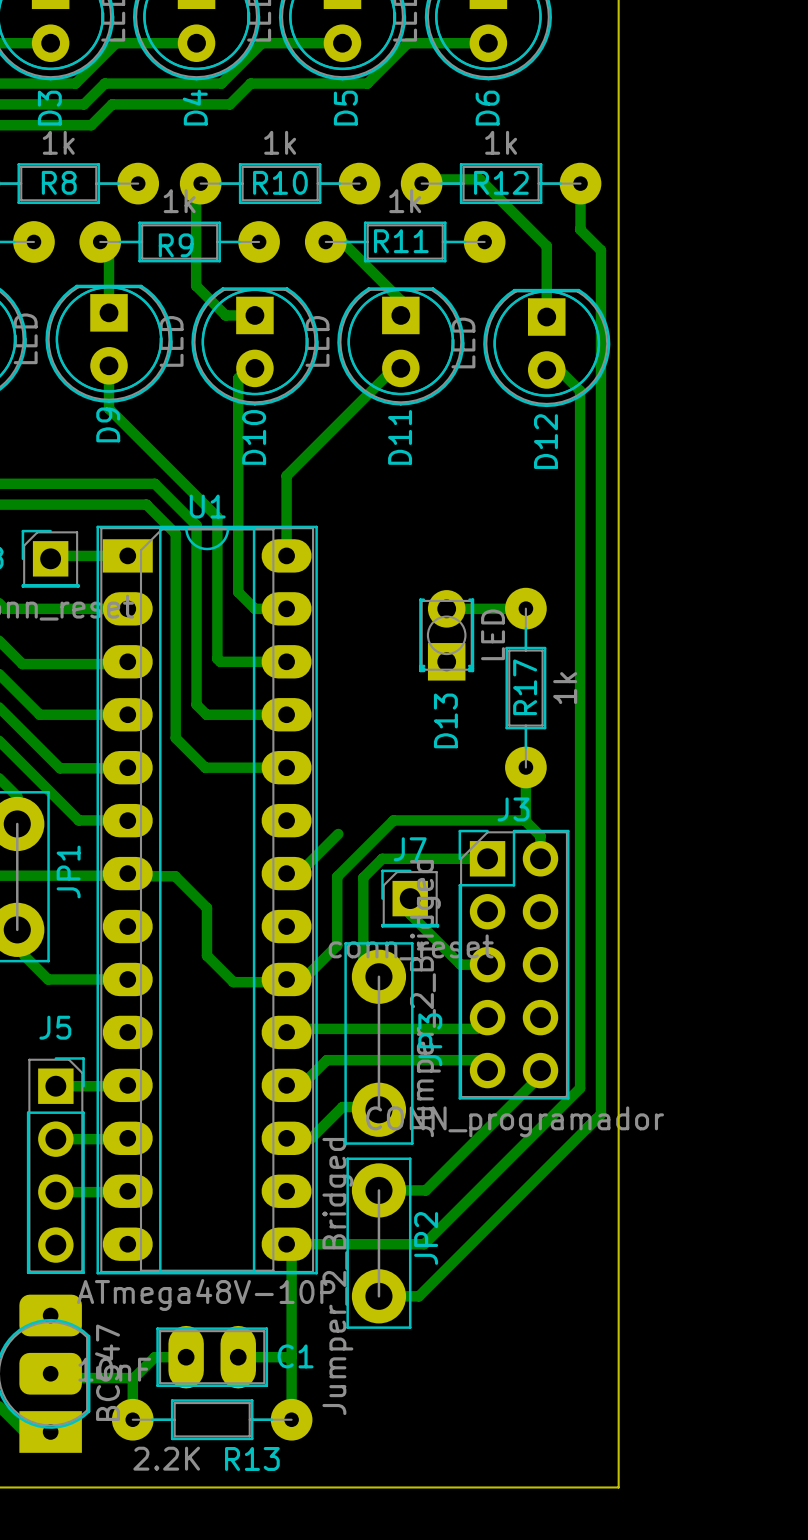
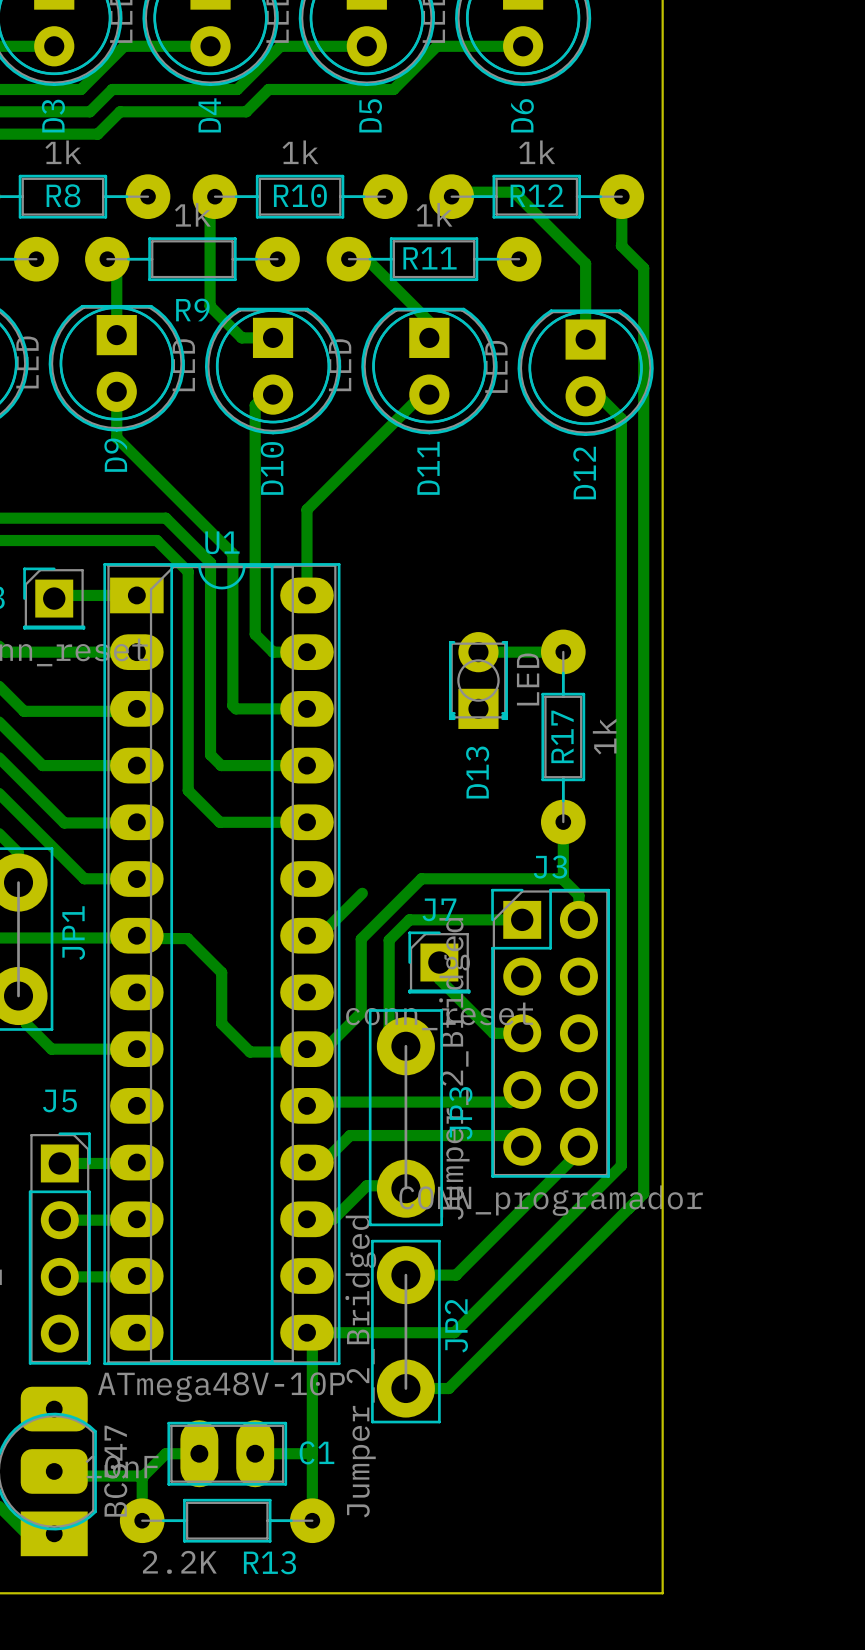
R9 name position: R9 (176, 245) -> R9 (192, 309)

